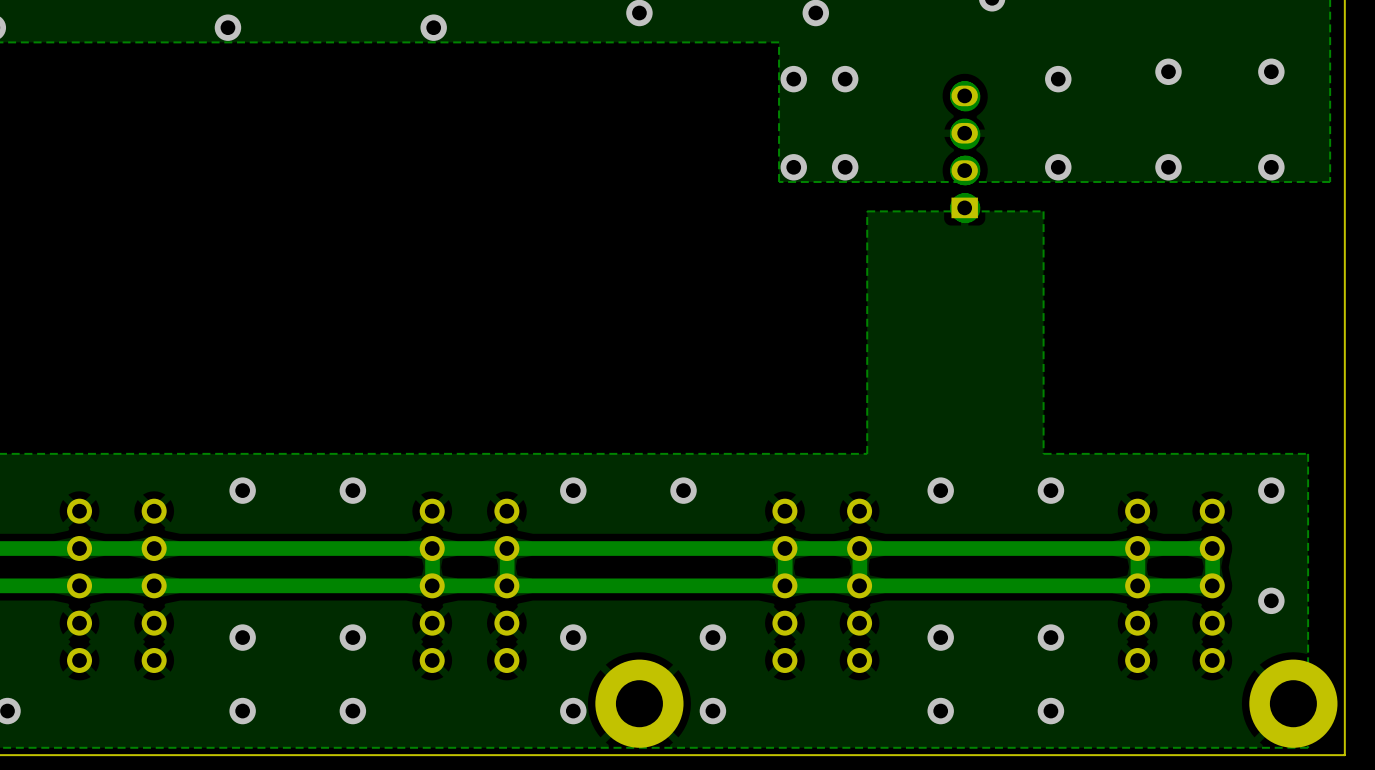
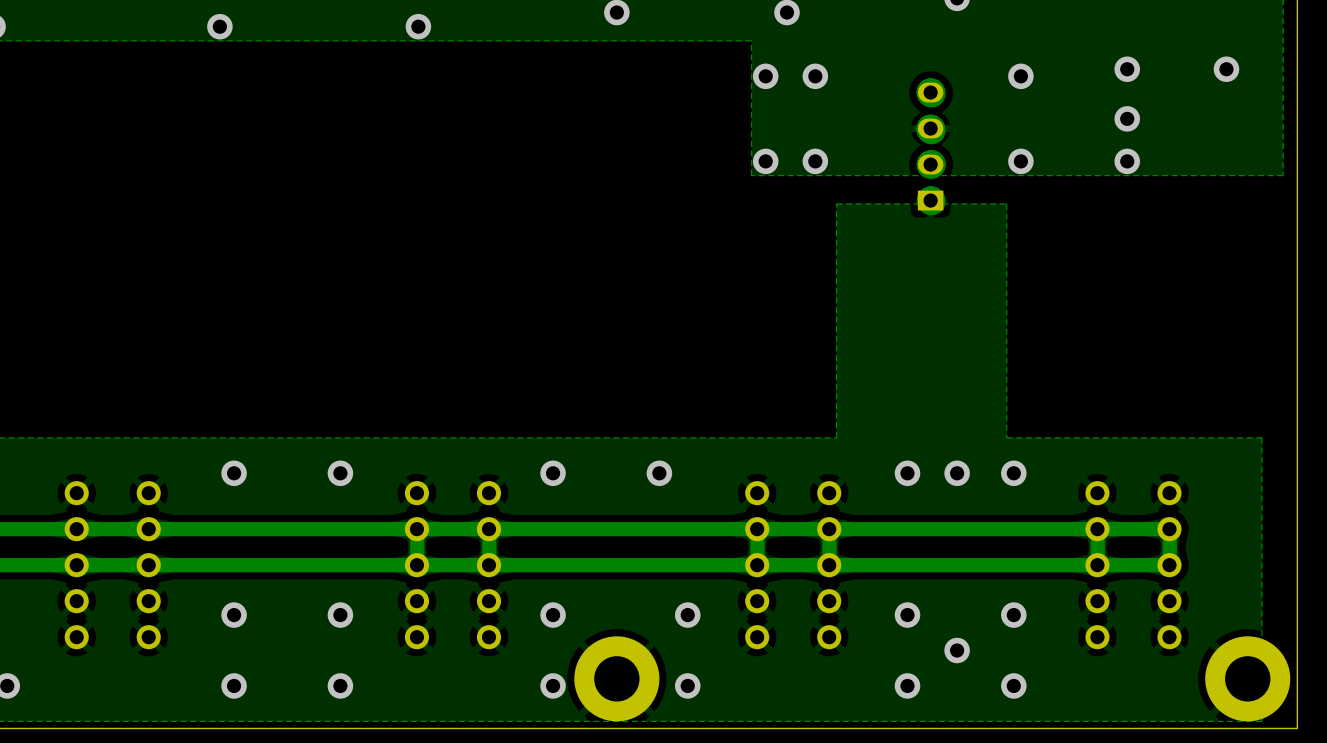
via: none -> (1127, 118)
via: (1271, 167) -> none
via: none -> (957, 473)
via: (1271, 490) -> none
via: (1271, 600) -> none
via: none -> (957, 650)

